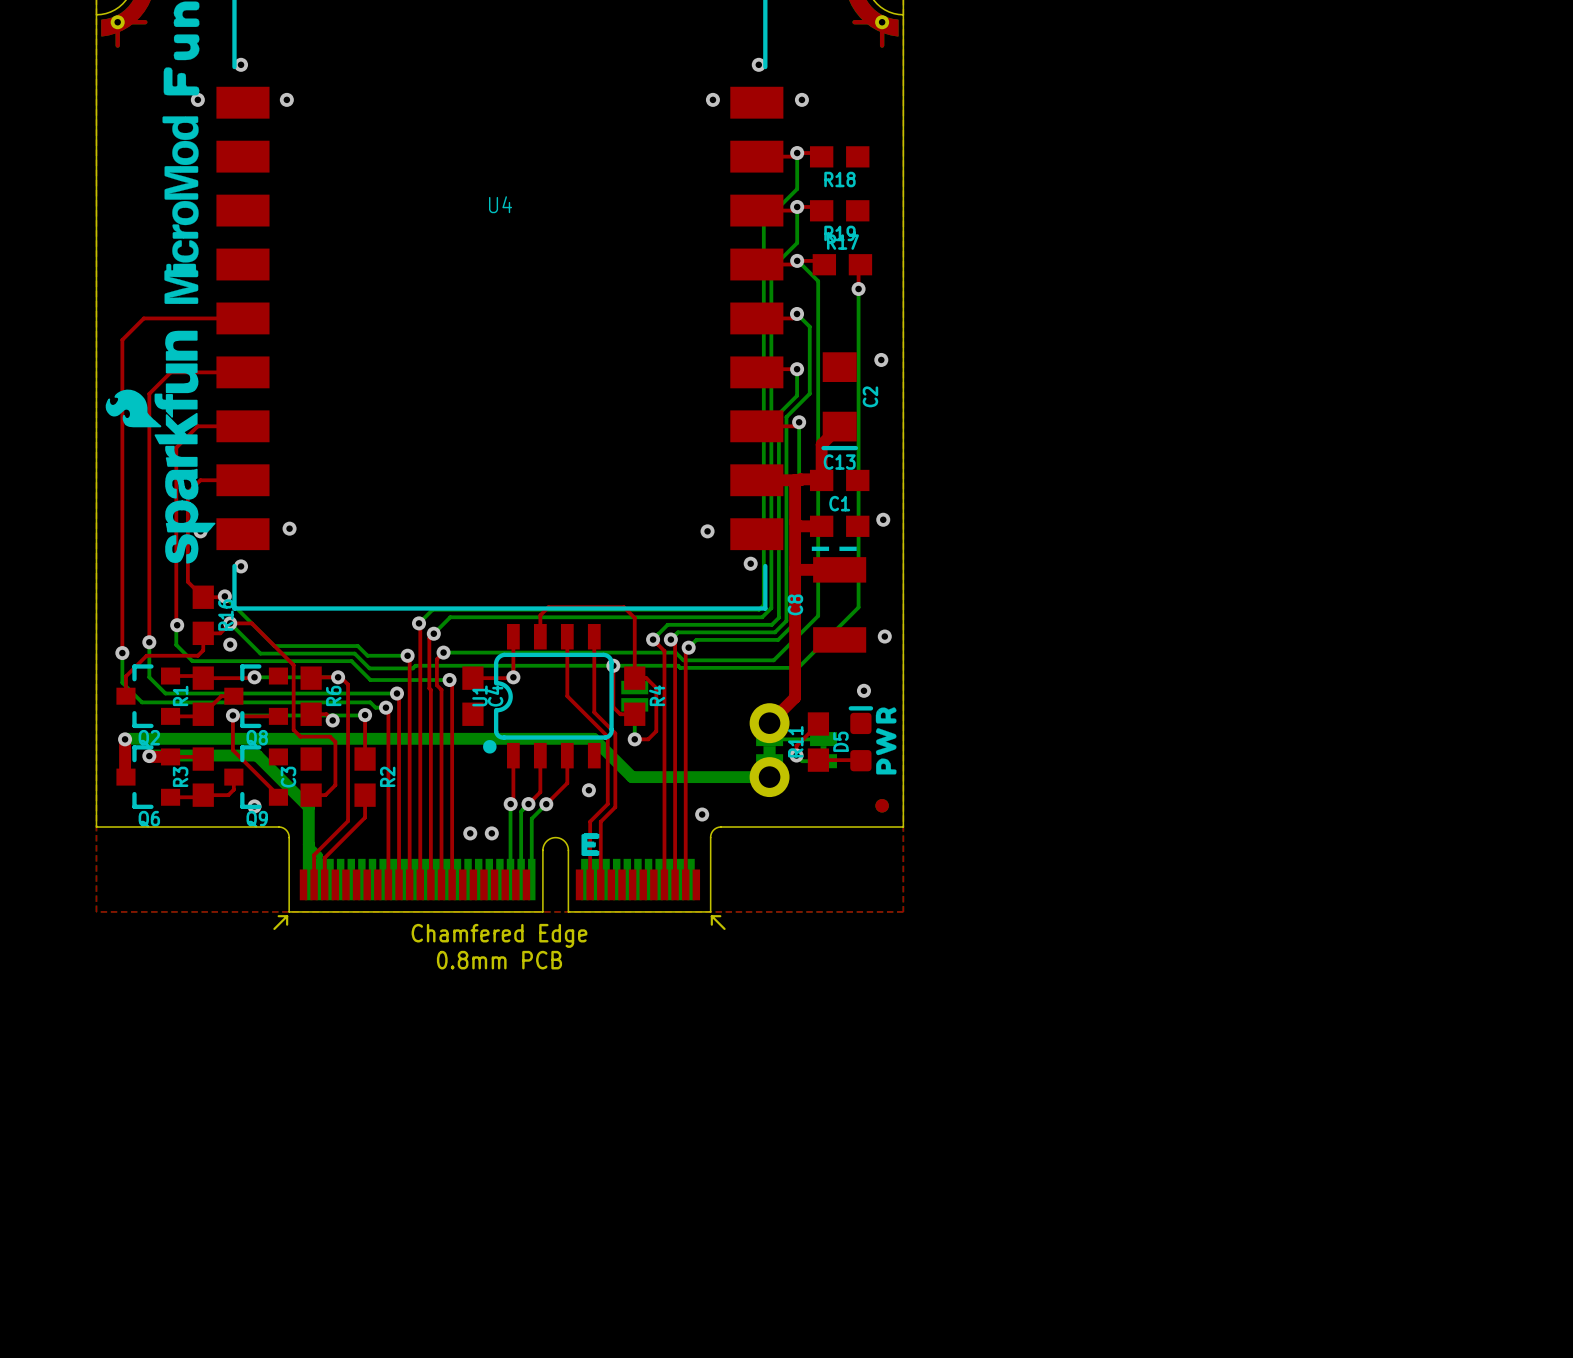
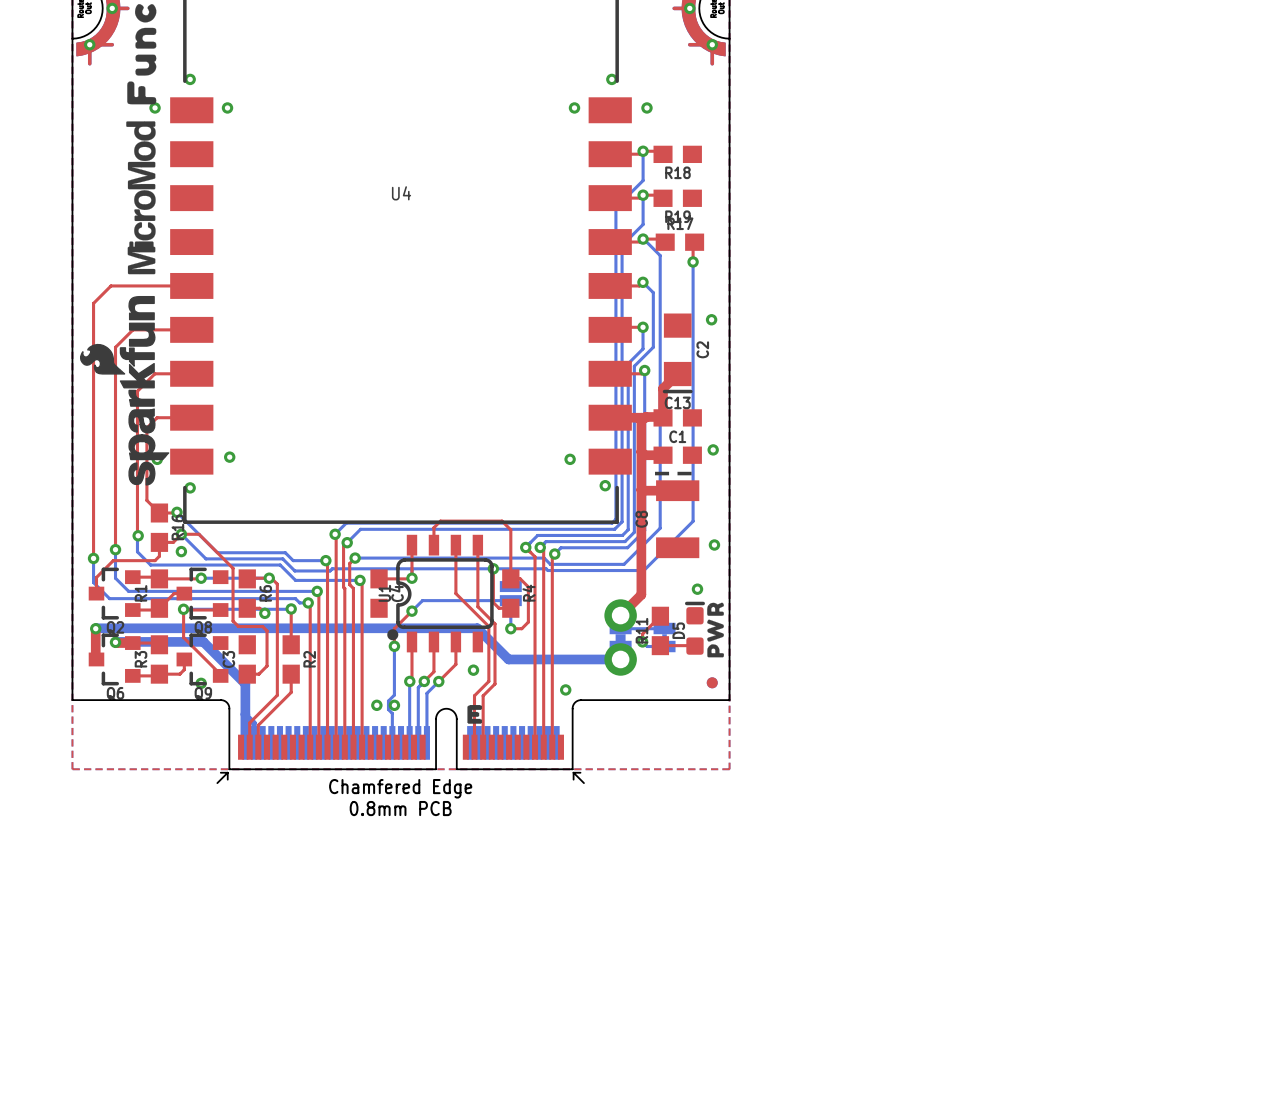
bottom track: none -> (510, 600) (422, 600) (411, 611)
top track: none -> (411, 611) (394, 628) (394, 646)
via: none -> (411, 611)
bottom track: none -> (394, 646) (394, 695) (388, 701) (388, 709) (392, 713) (392, 742)
via: none -> (394, 646)

